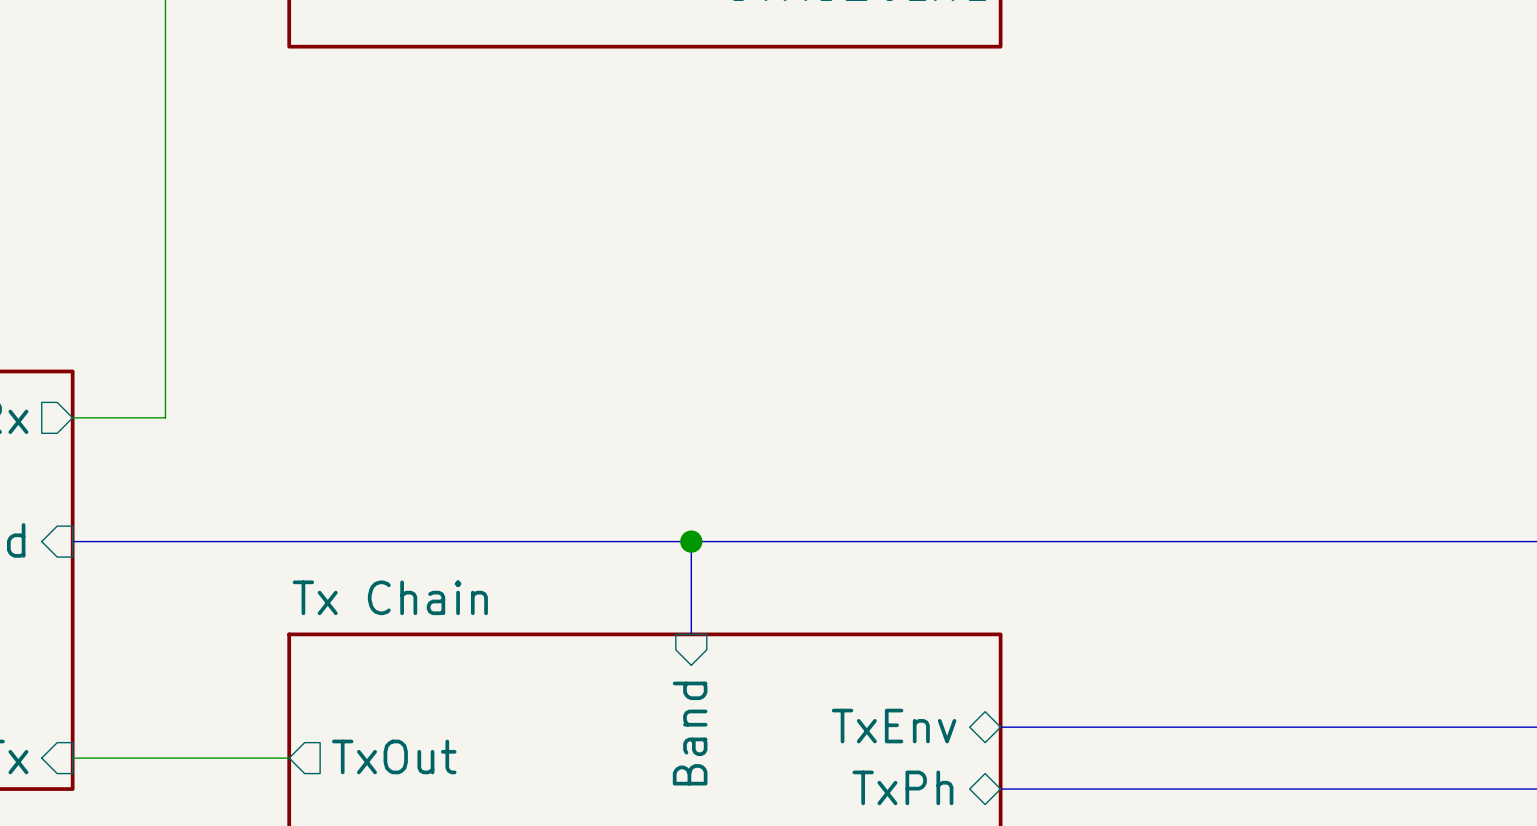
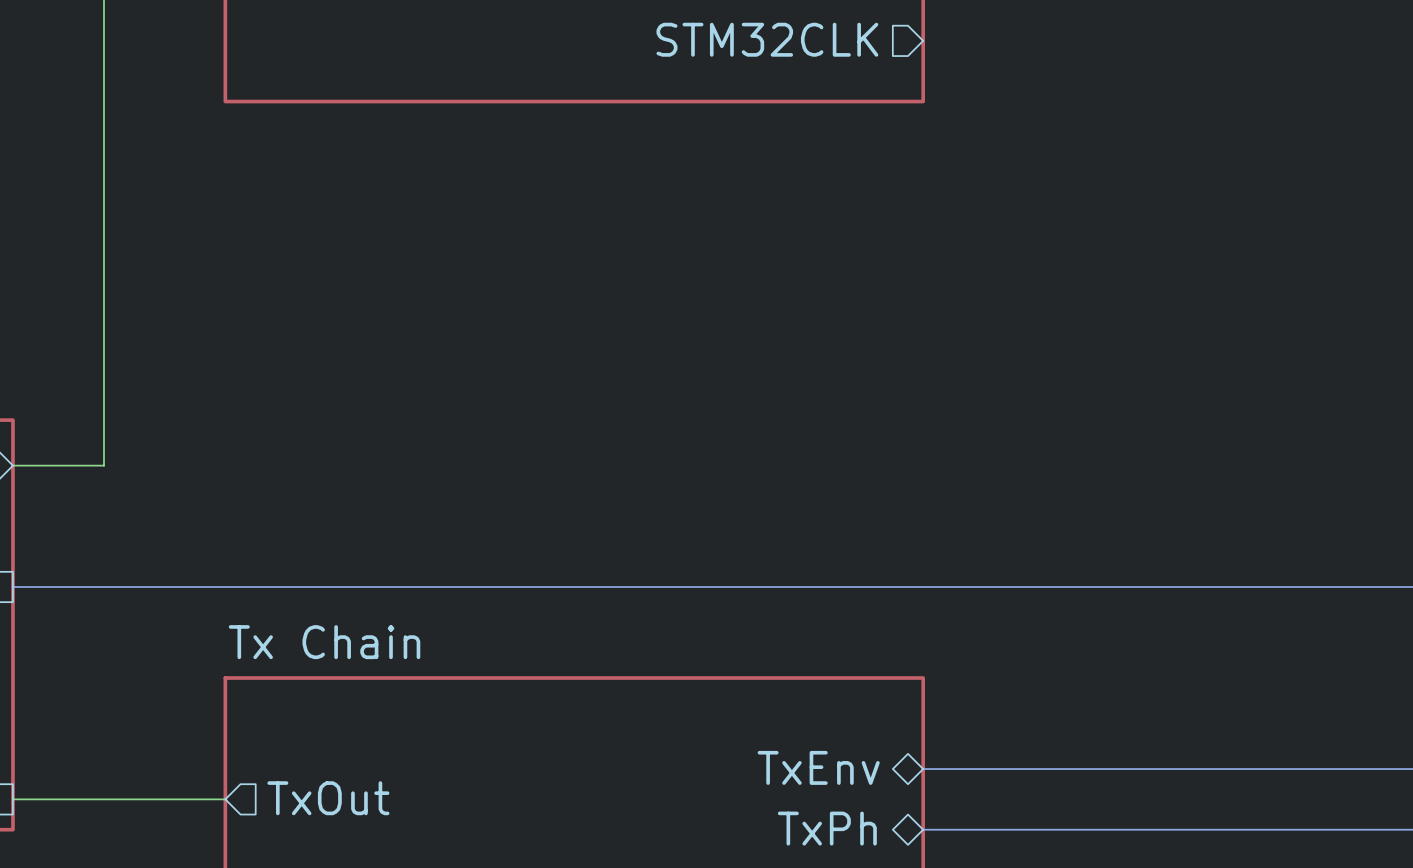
bus: (691, 541) (691, 634) -> none
junction: (691, 541) -> none
sheet pin: Band (690, 733) -> none

